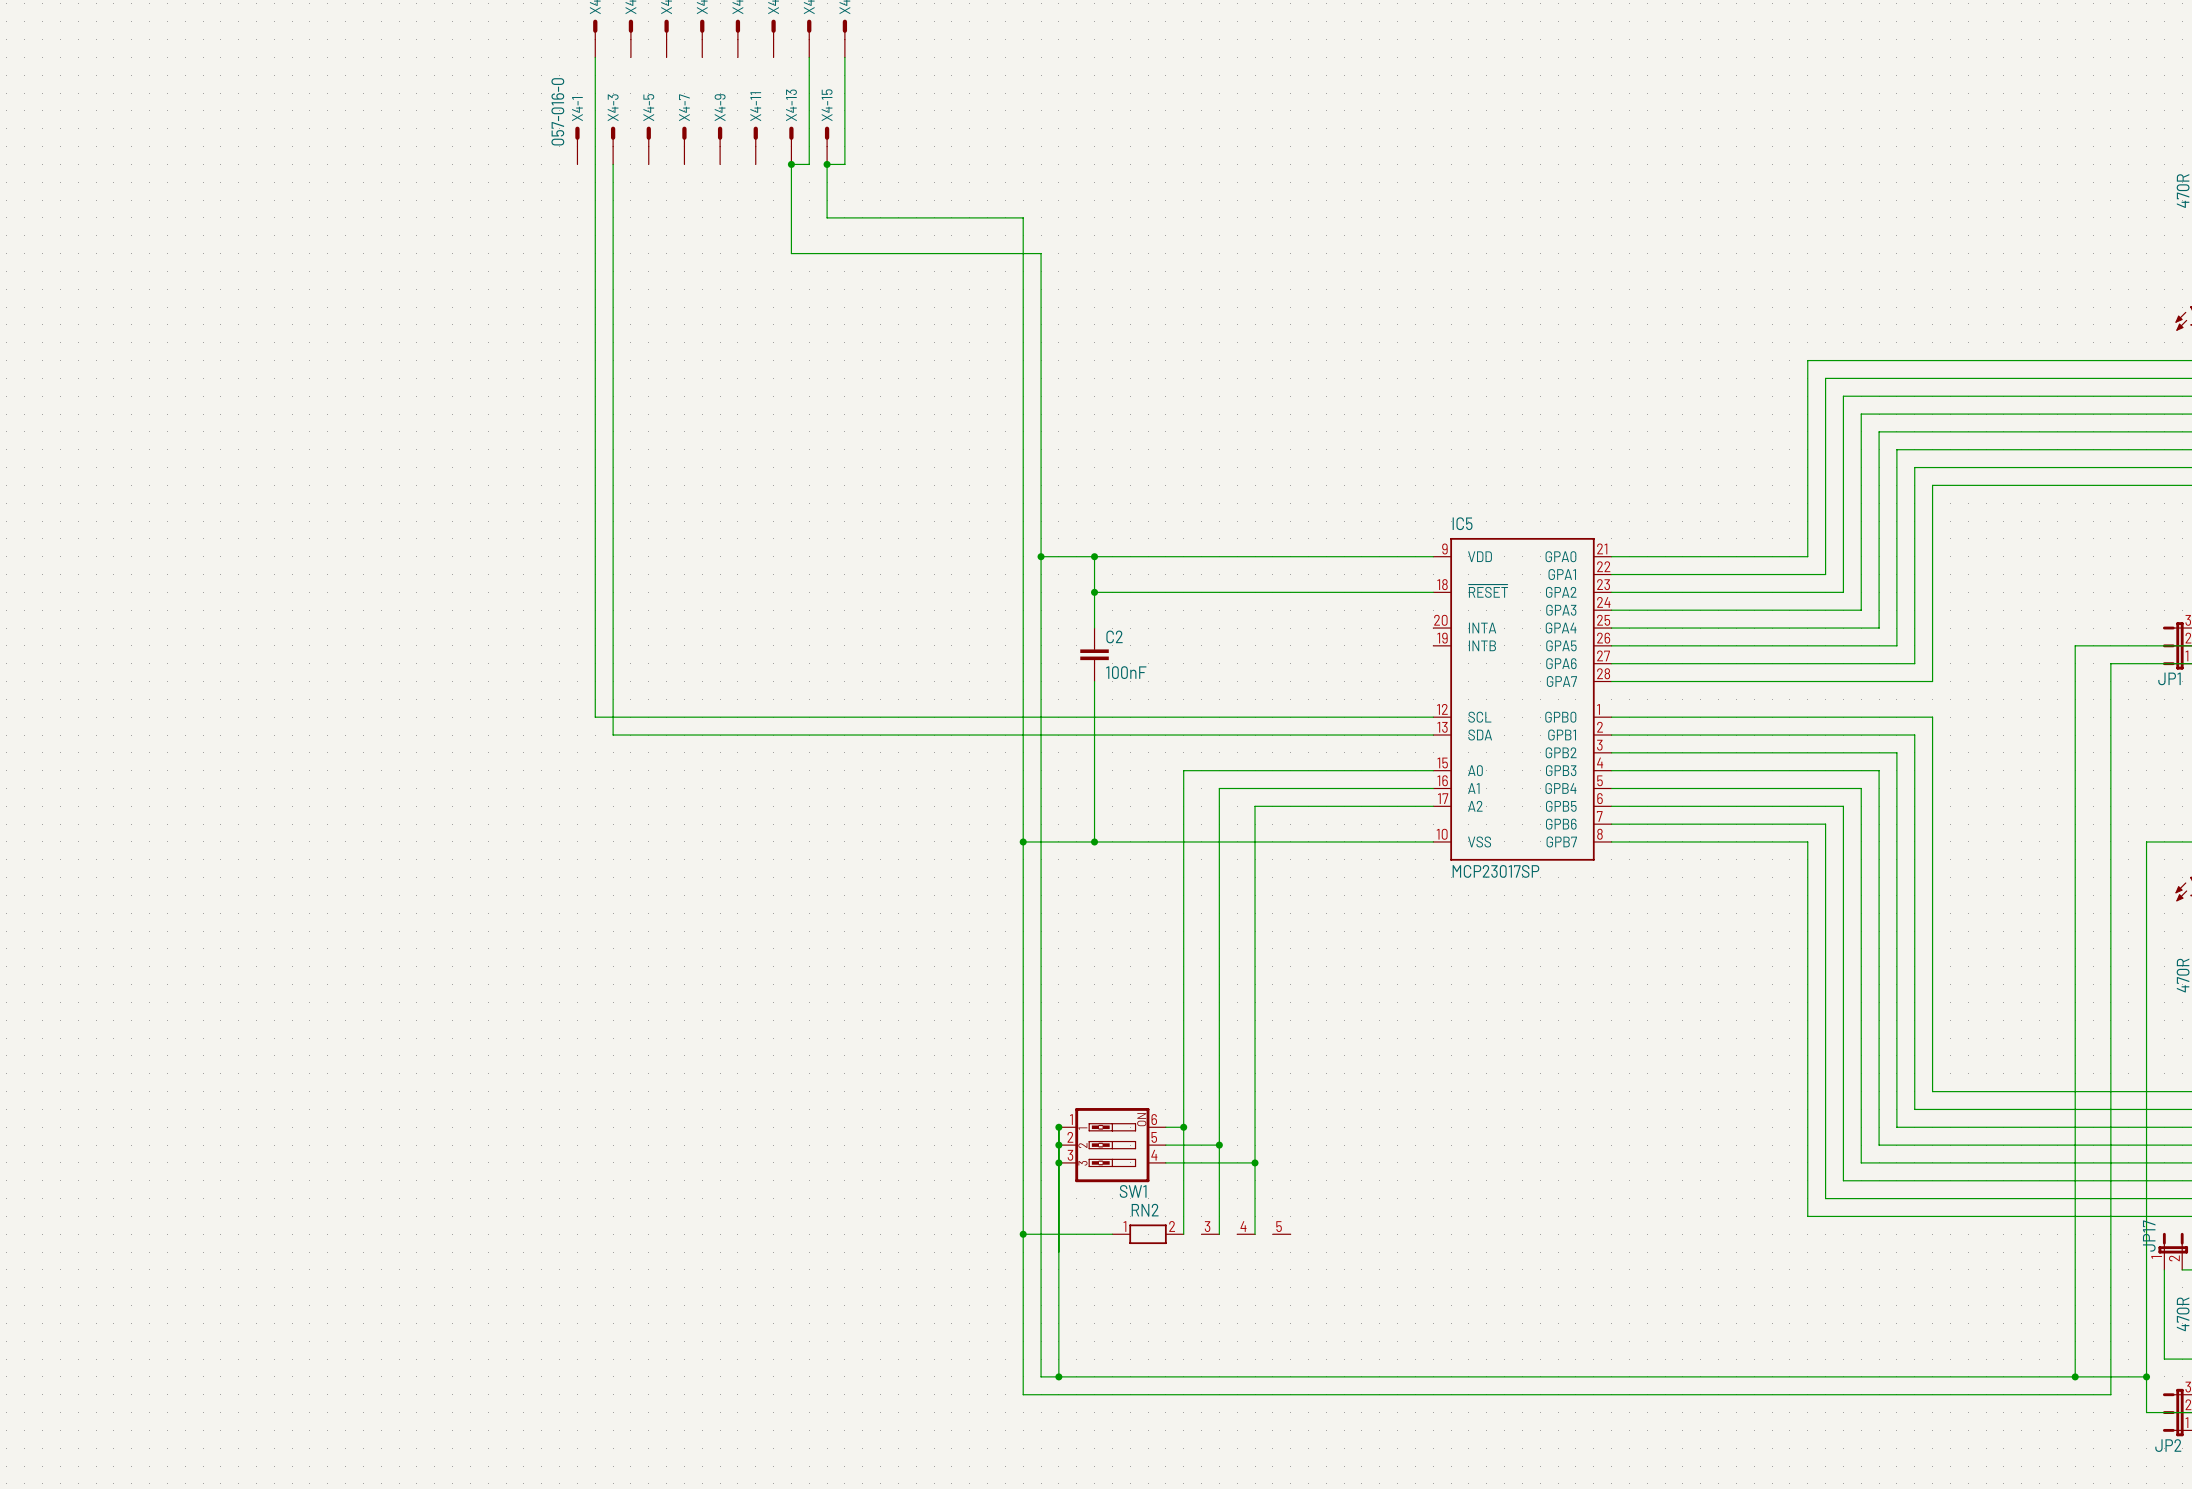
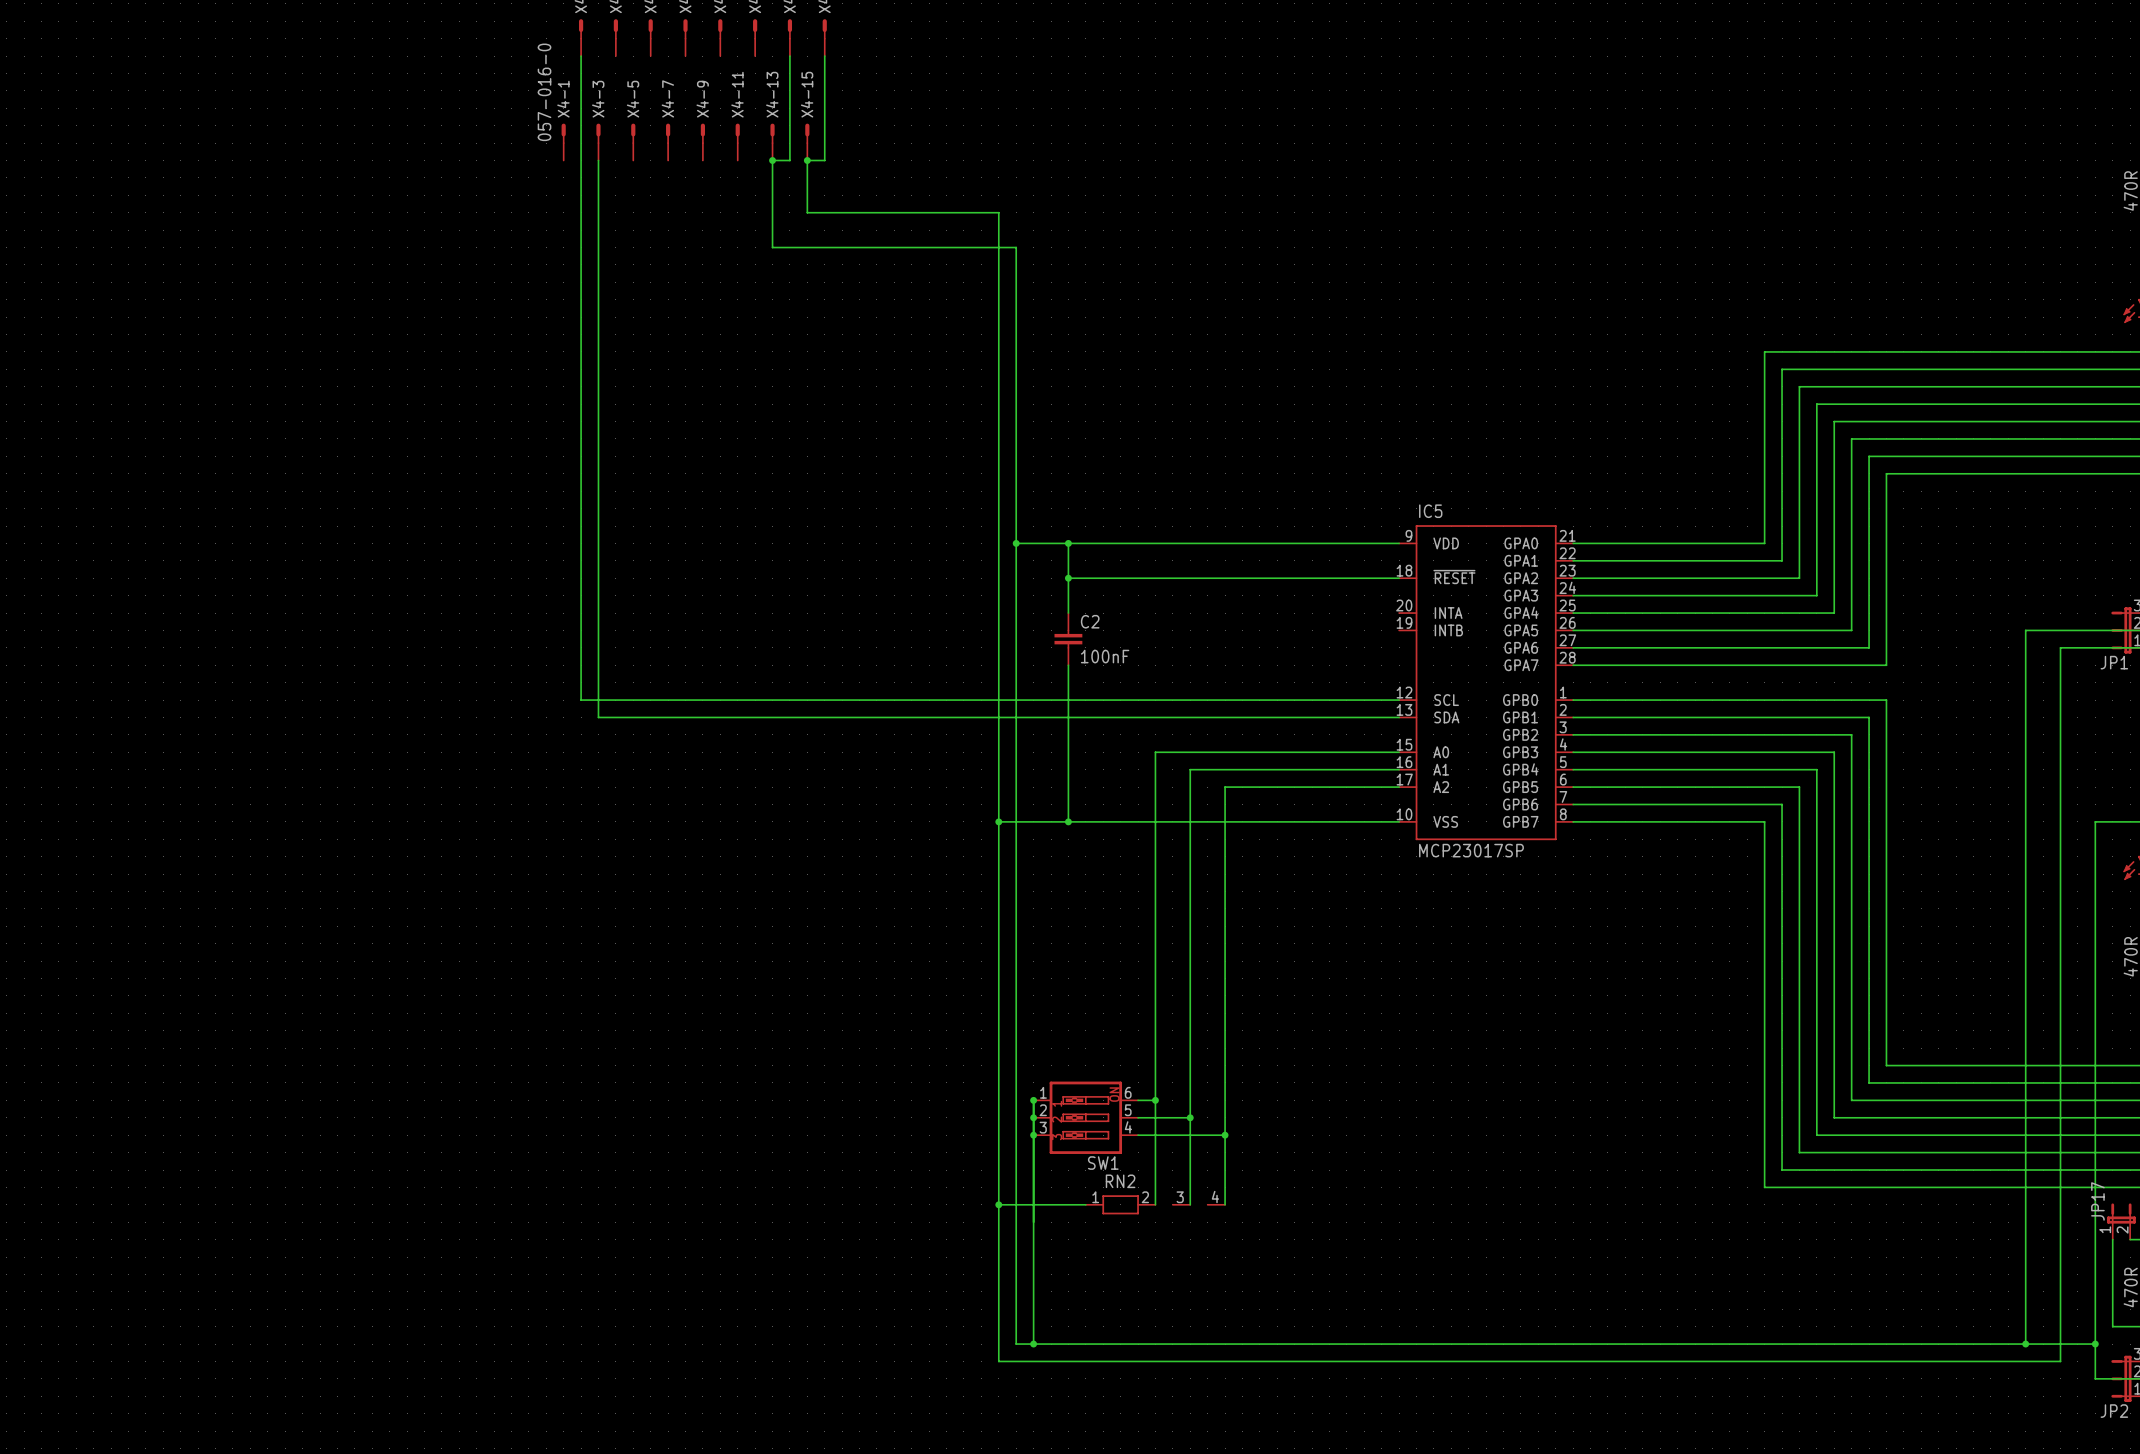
RN2 symbol: [1112, 1224, 1291, 1245] -> [1085, 1195, 1226, 1215]

